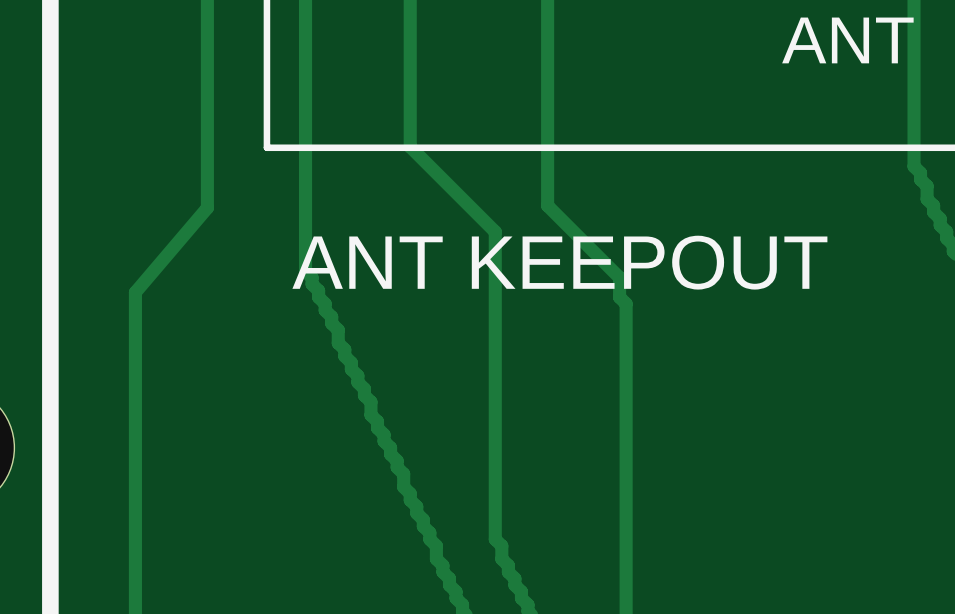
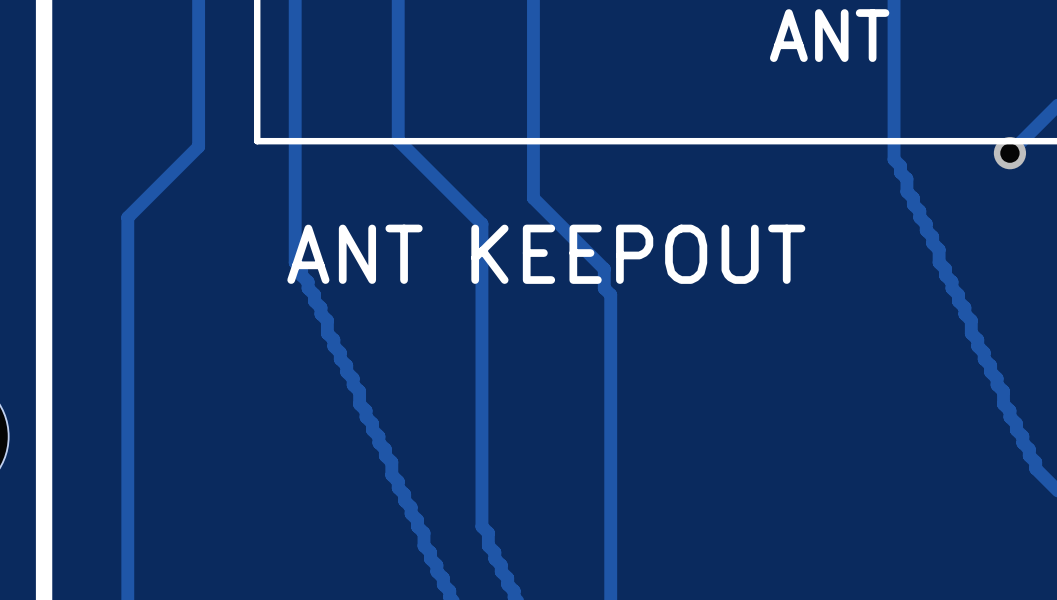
track: (207, 153) (207, 207) (135, 292) -> (198, 146) (127, 217) (127, 283)

